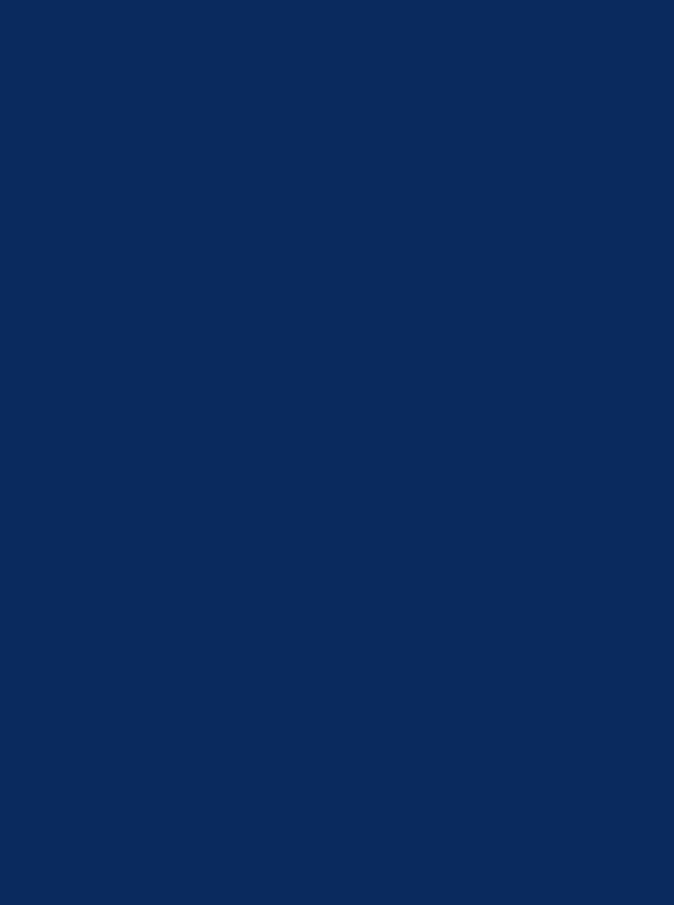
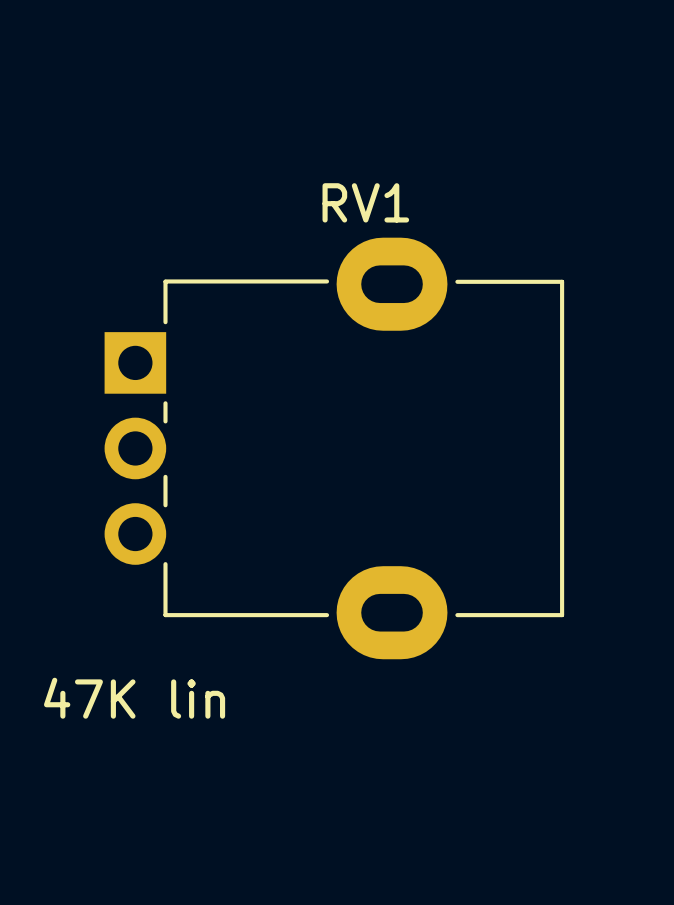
RV1: none -> 47K lin (334, 448)

